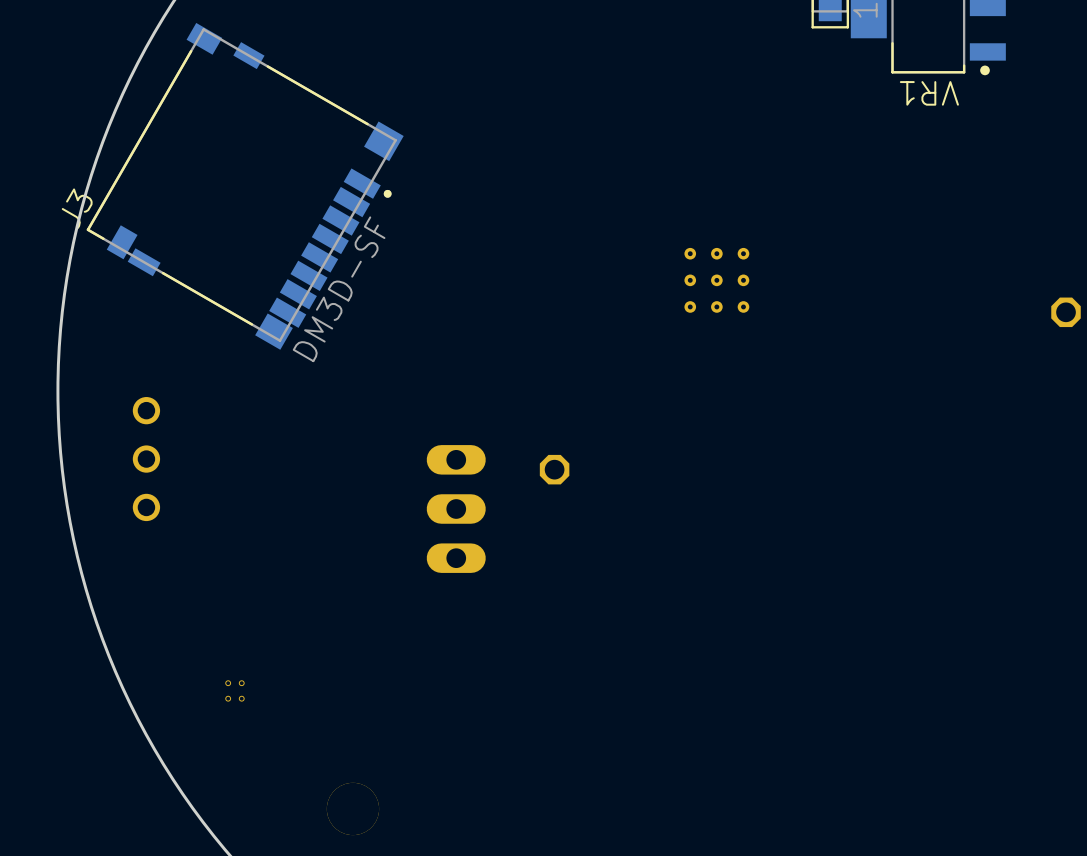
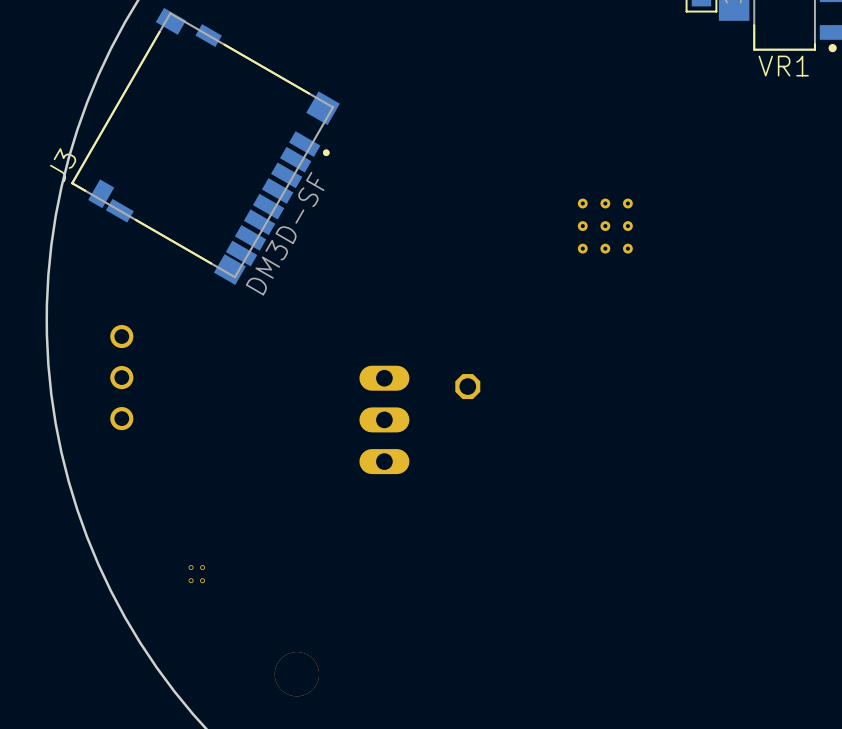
VR1 name rotation: 0° (929, 93) -> 180° (783, 66)

